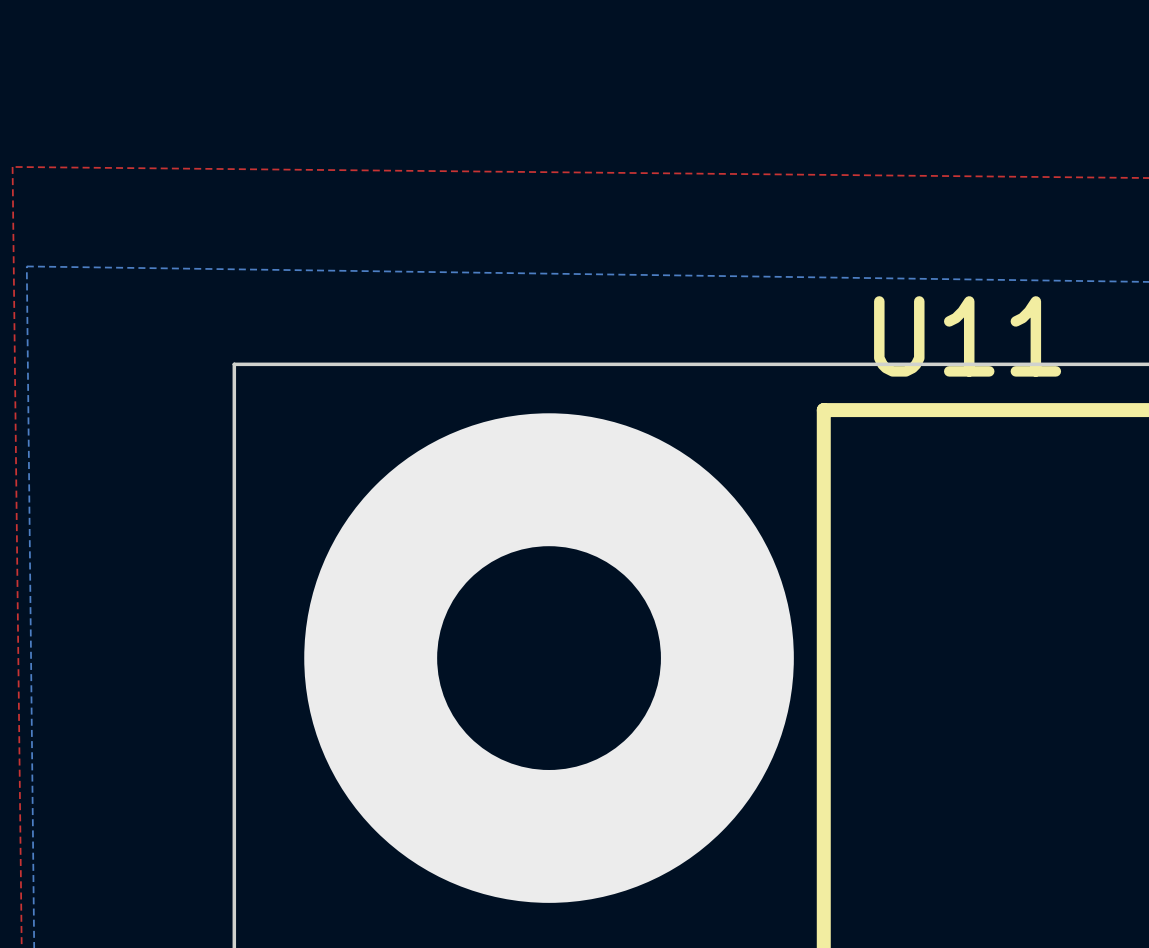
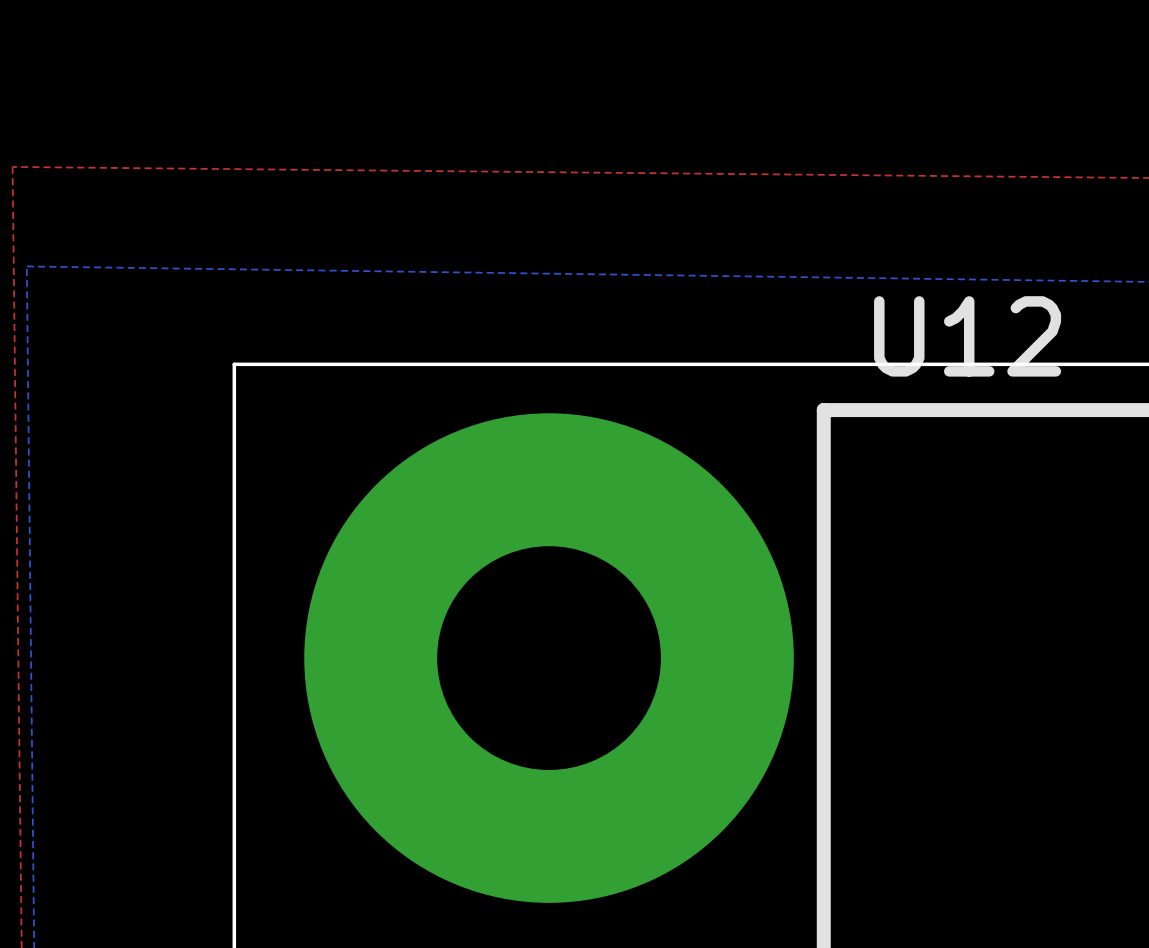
U11 name: U11 (967, 336) -> U12 (967, 336)

